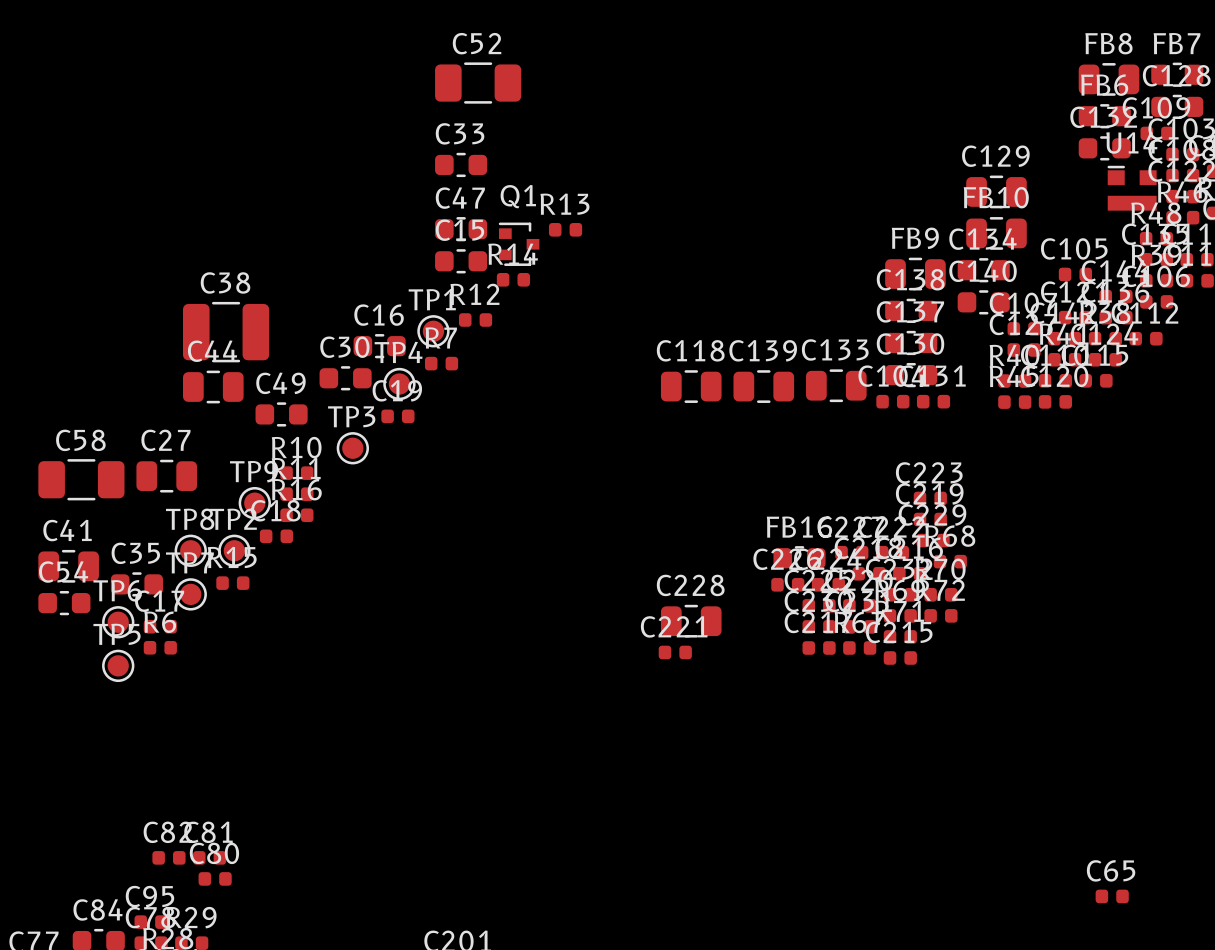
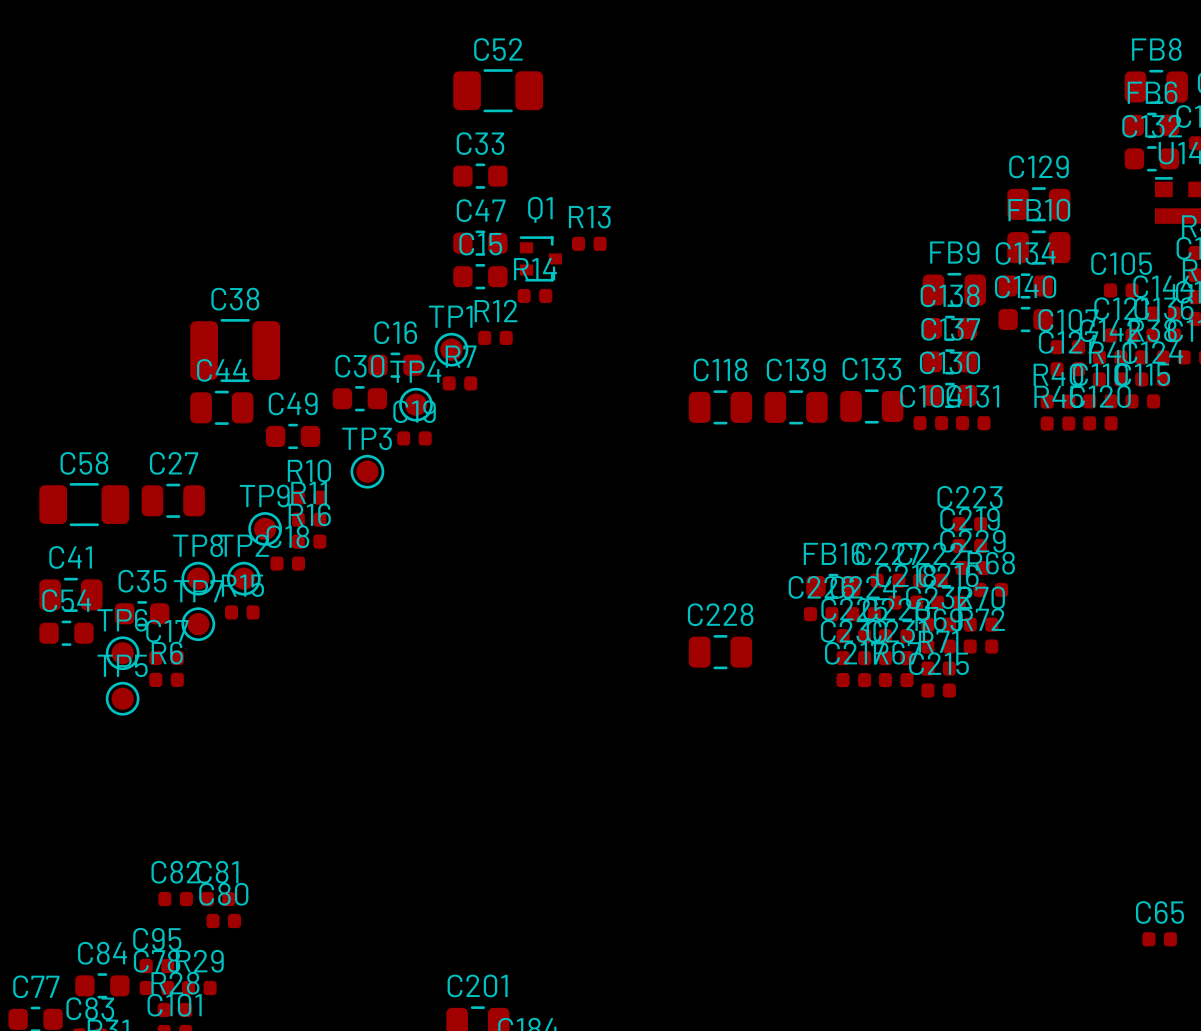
C221: (675, 652) -> none

